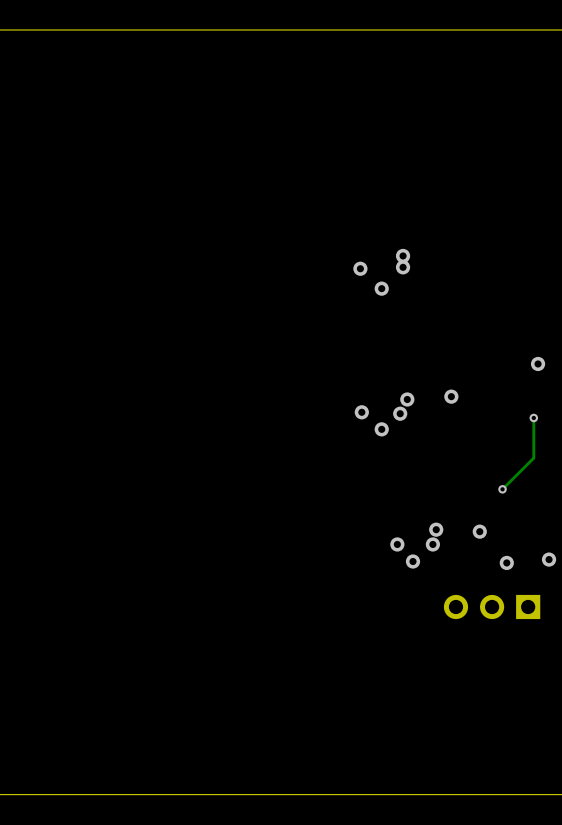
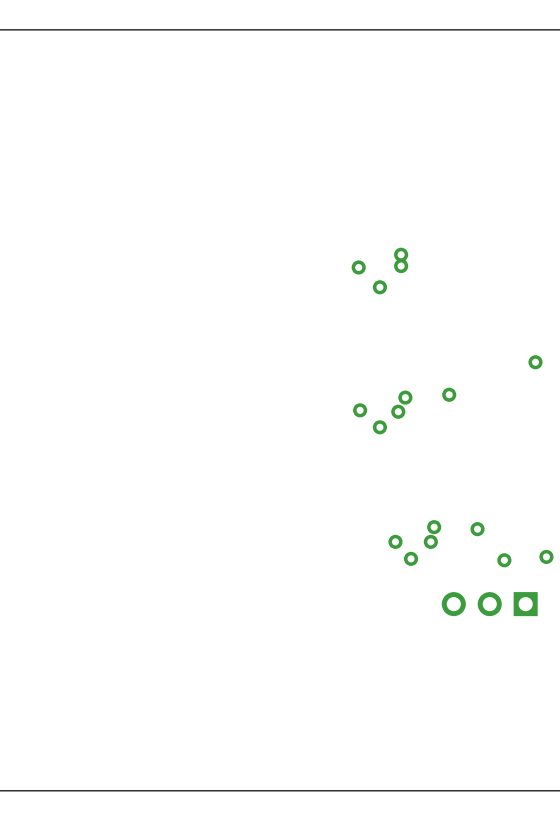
track: (533, 417) (533, 458) (502, 489) -> none
via: (533, 417) -> none
via: (502, 489) -> none

